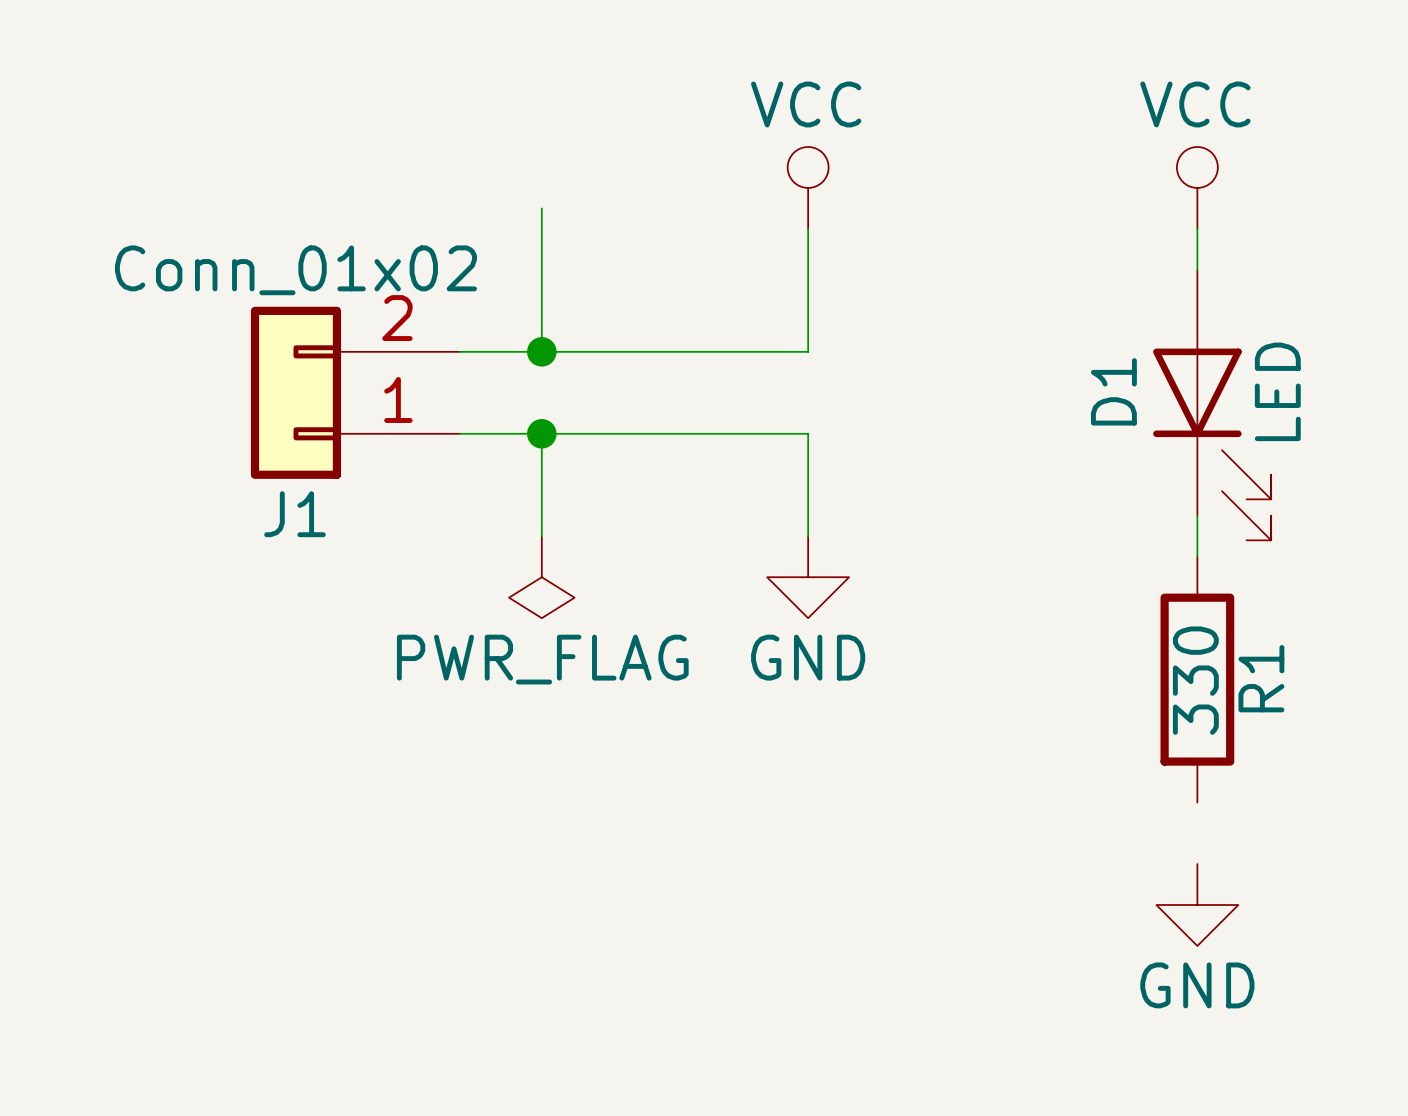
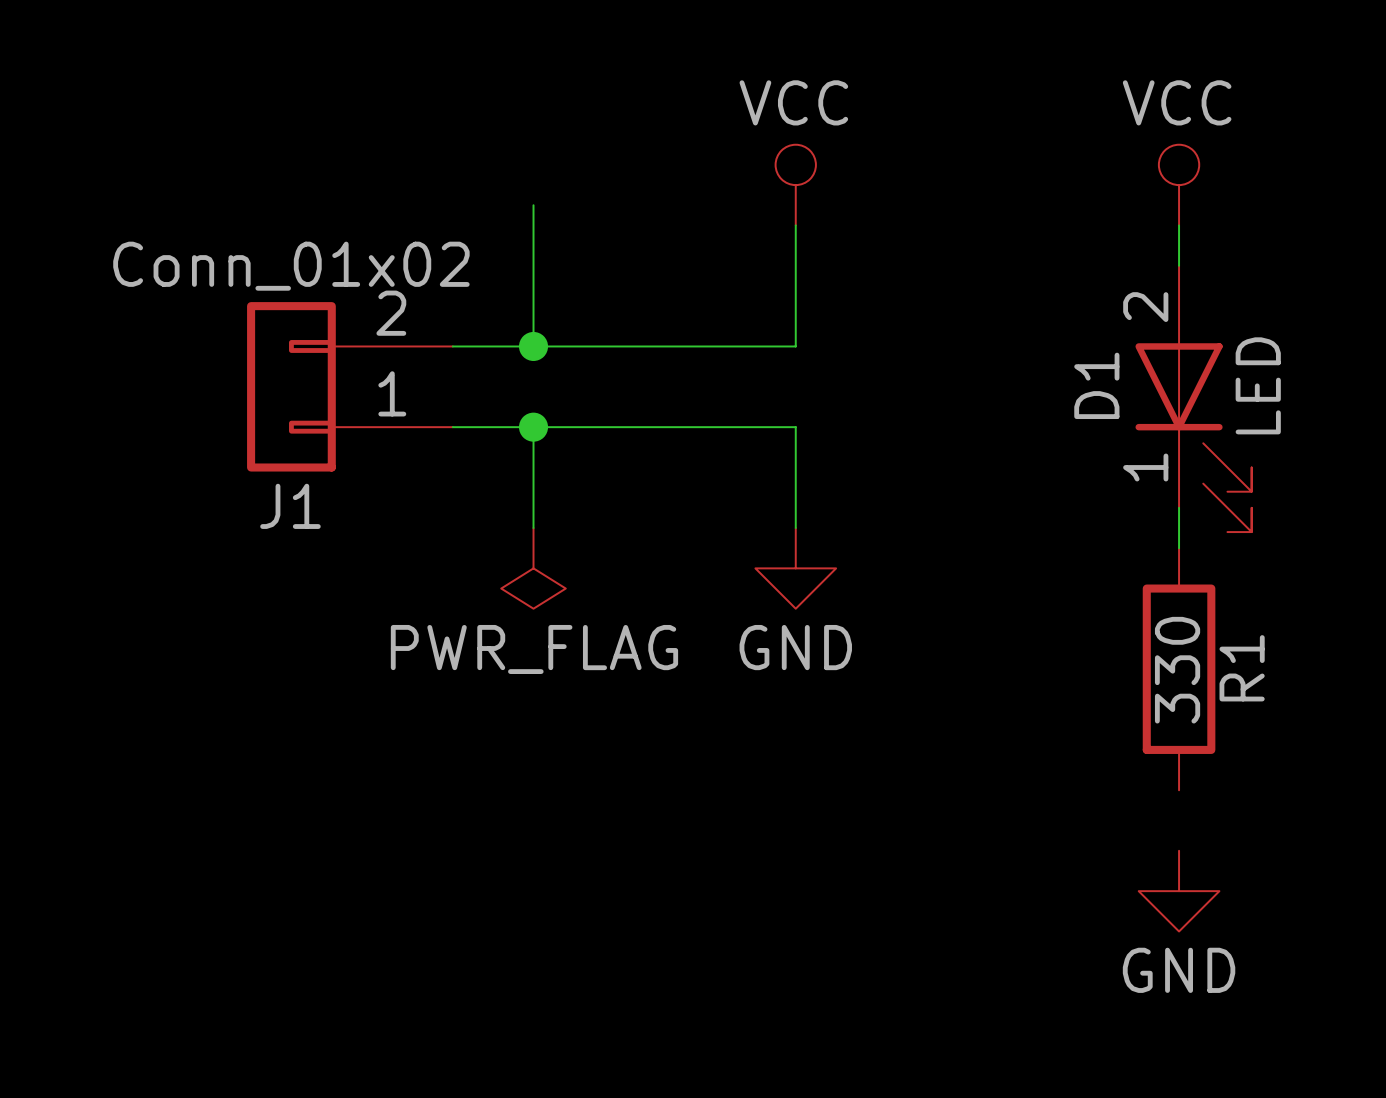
D1 pin number: none -> 2 (1145, 307)
D1 pin number: none -> 1 (1145, 467)

